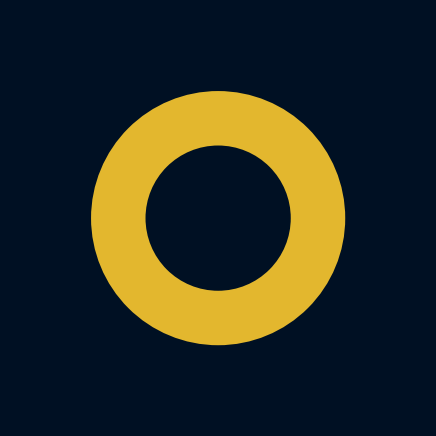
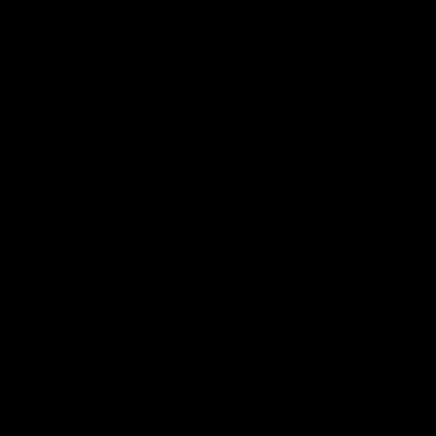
part: (218, 218) -> none

